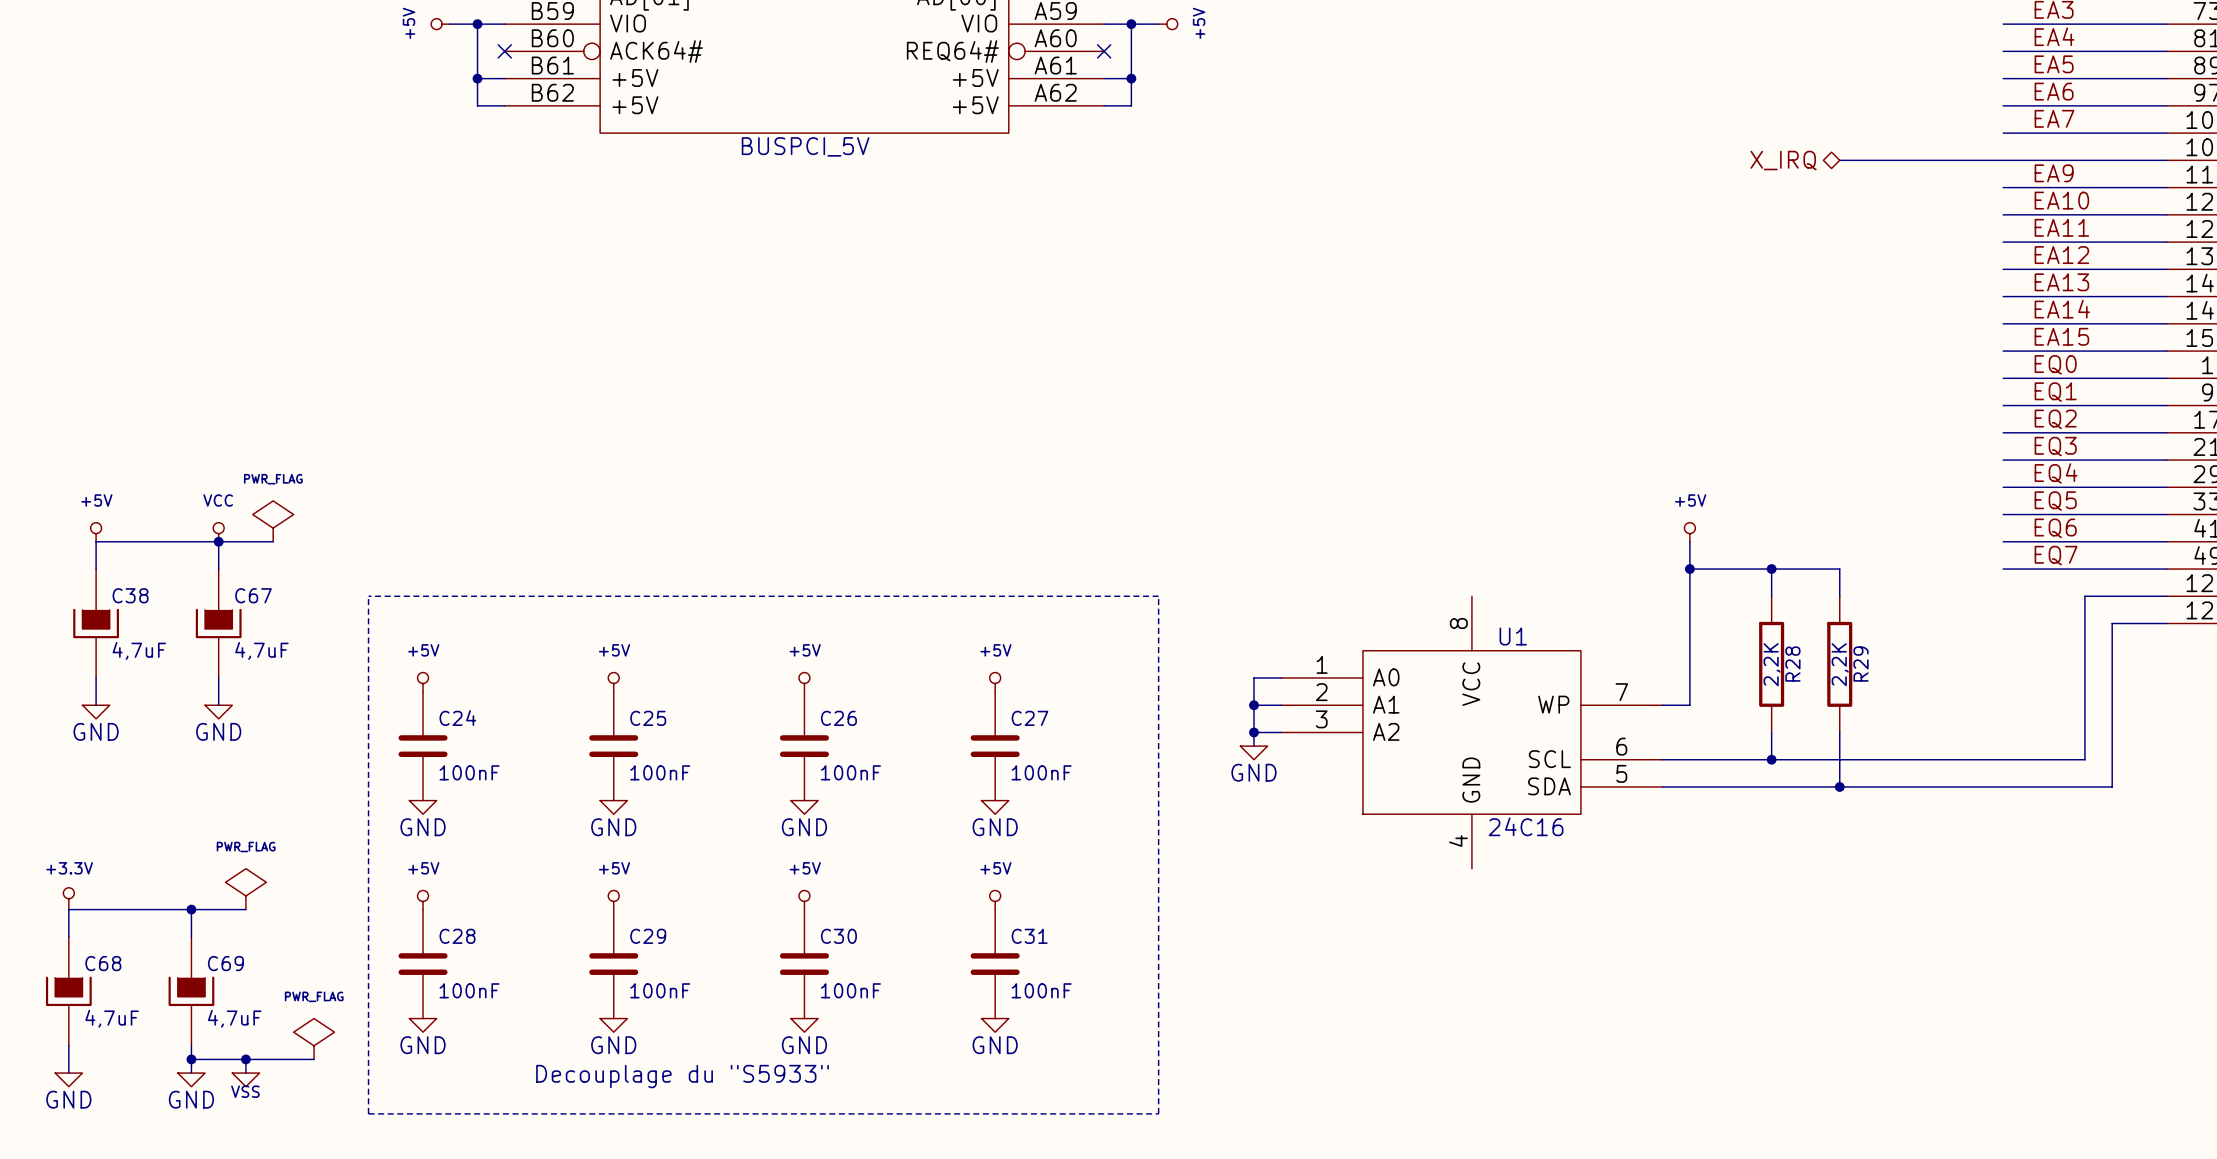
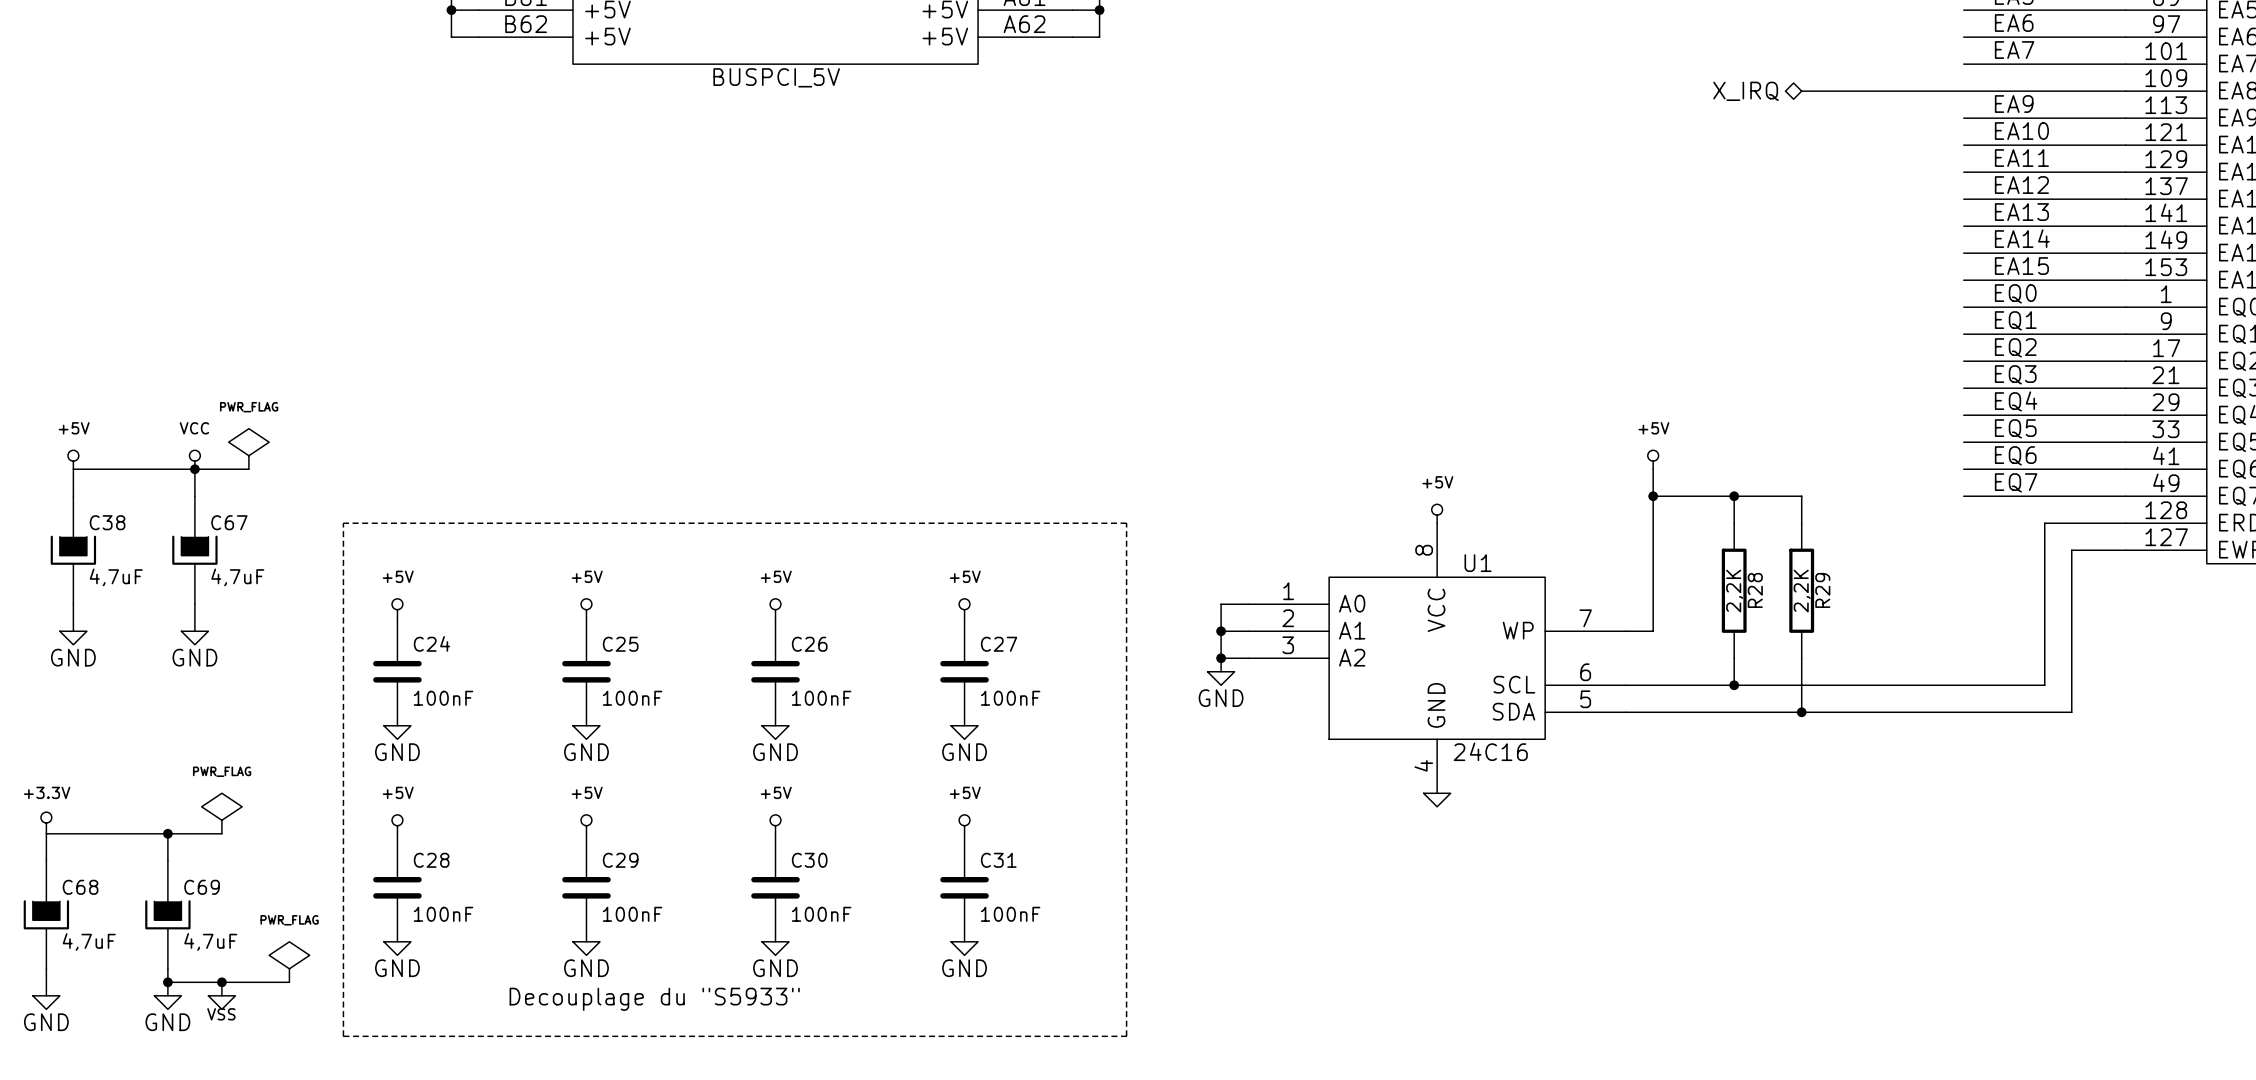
power symbol: none -> +5V (1437, 513)
power symbol: none -> (1437, 800)

